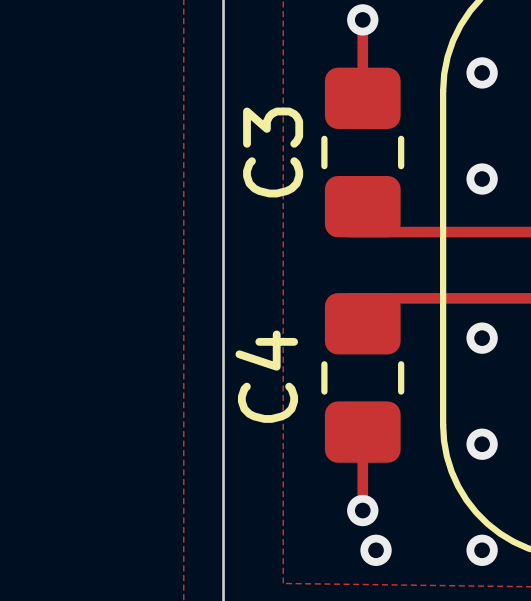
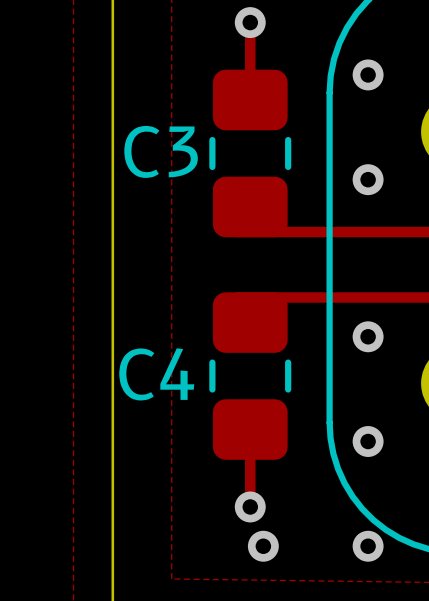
C3 name rotation: 0° (273, 152) -> 90° clockwise (161, 151)
C4 name rotation: 0° (266, 376) -> 90° clockwise (156, 374)

